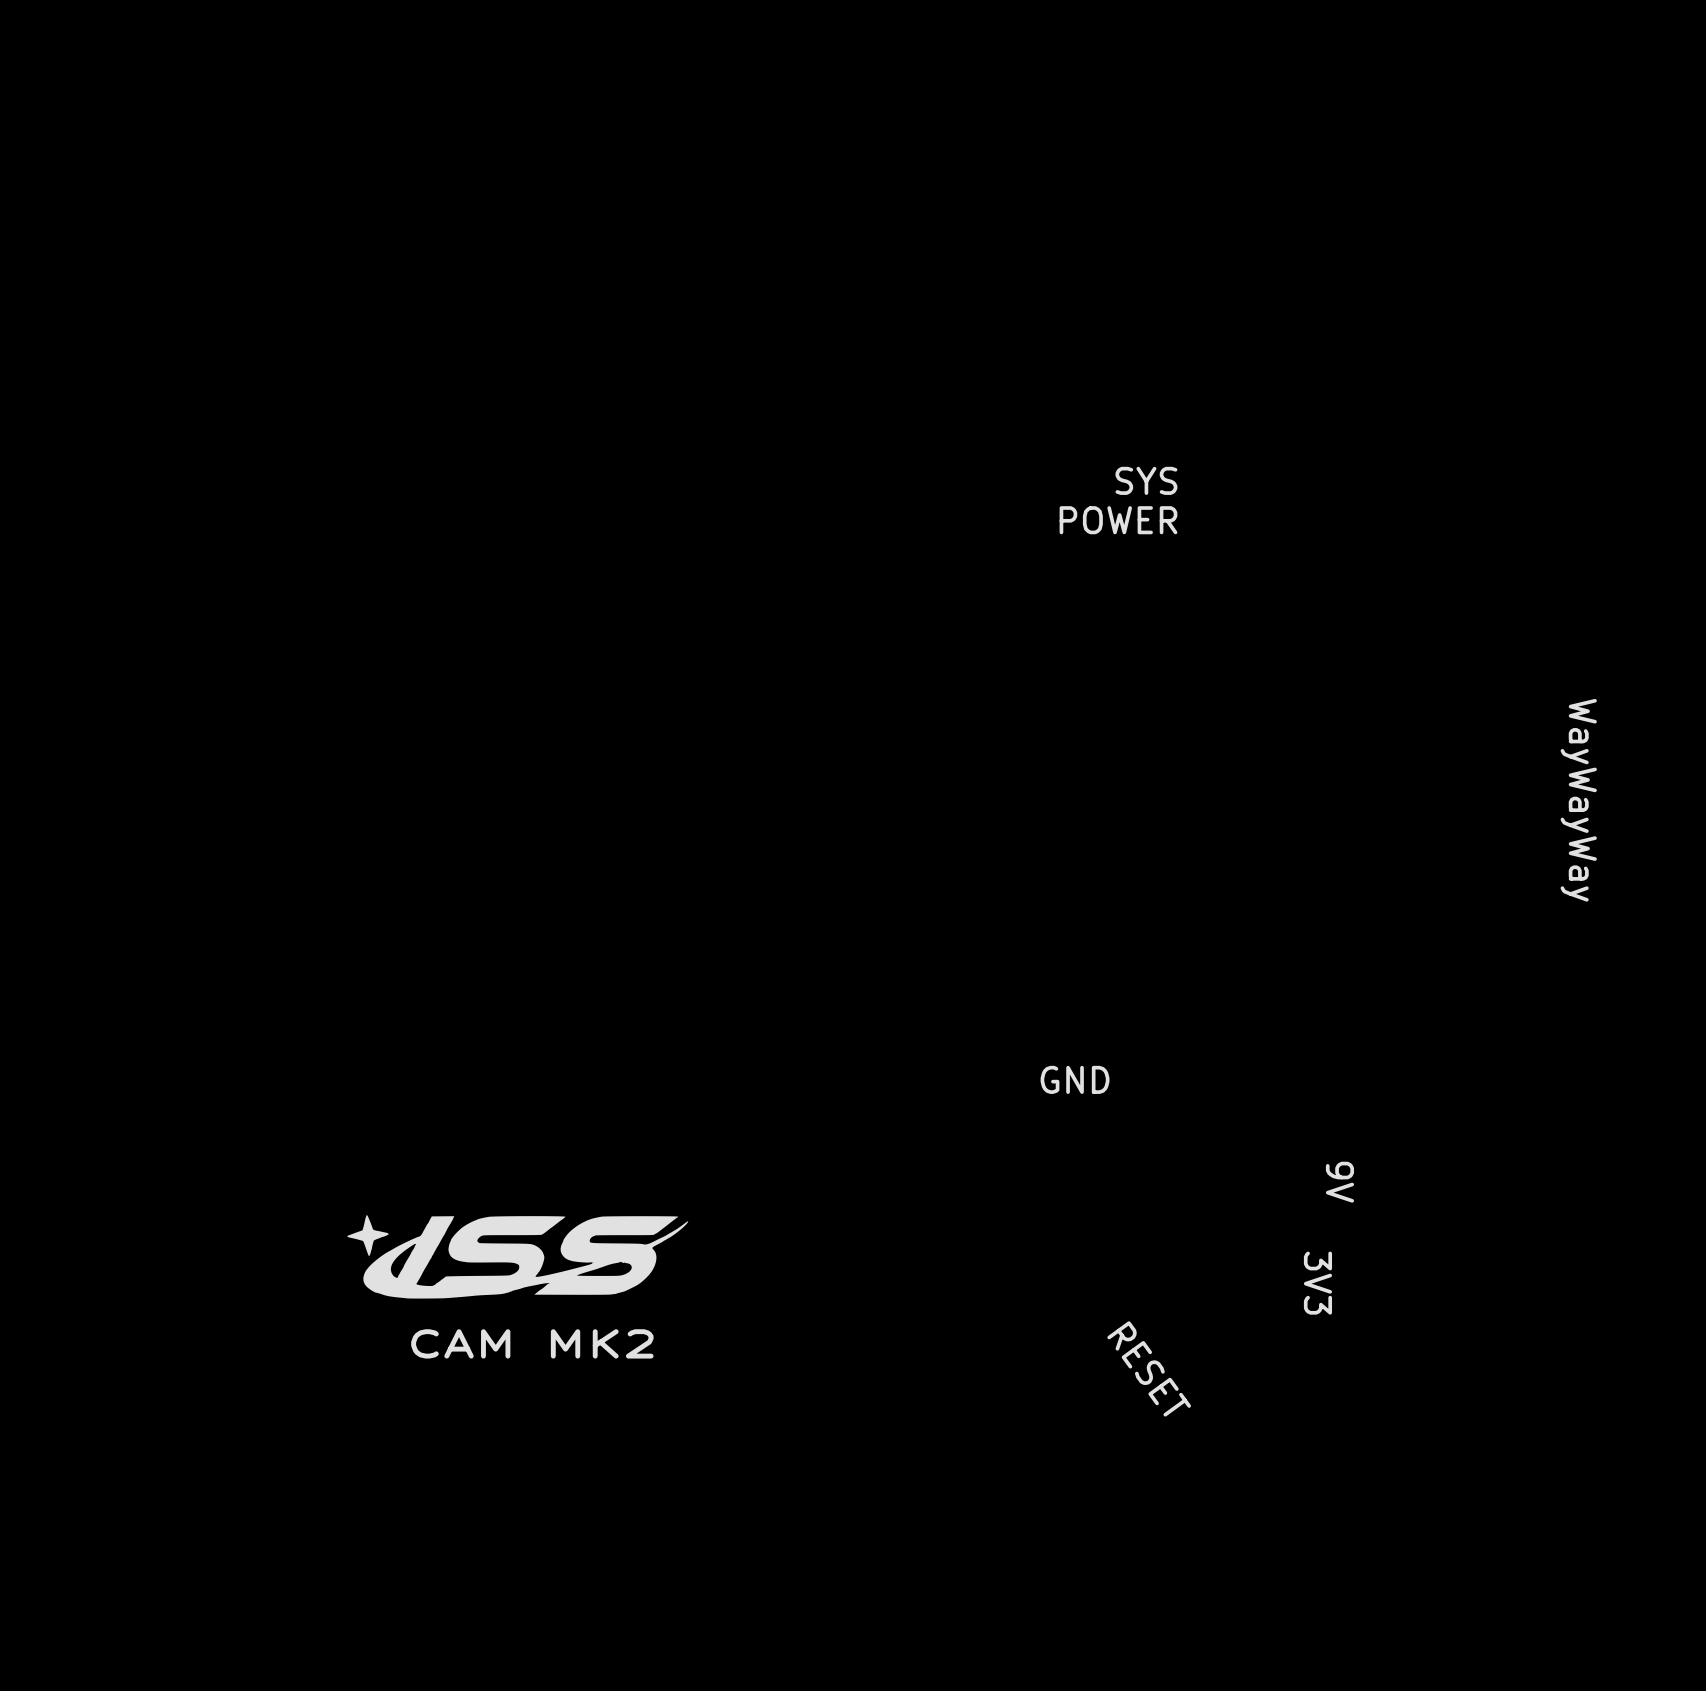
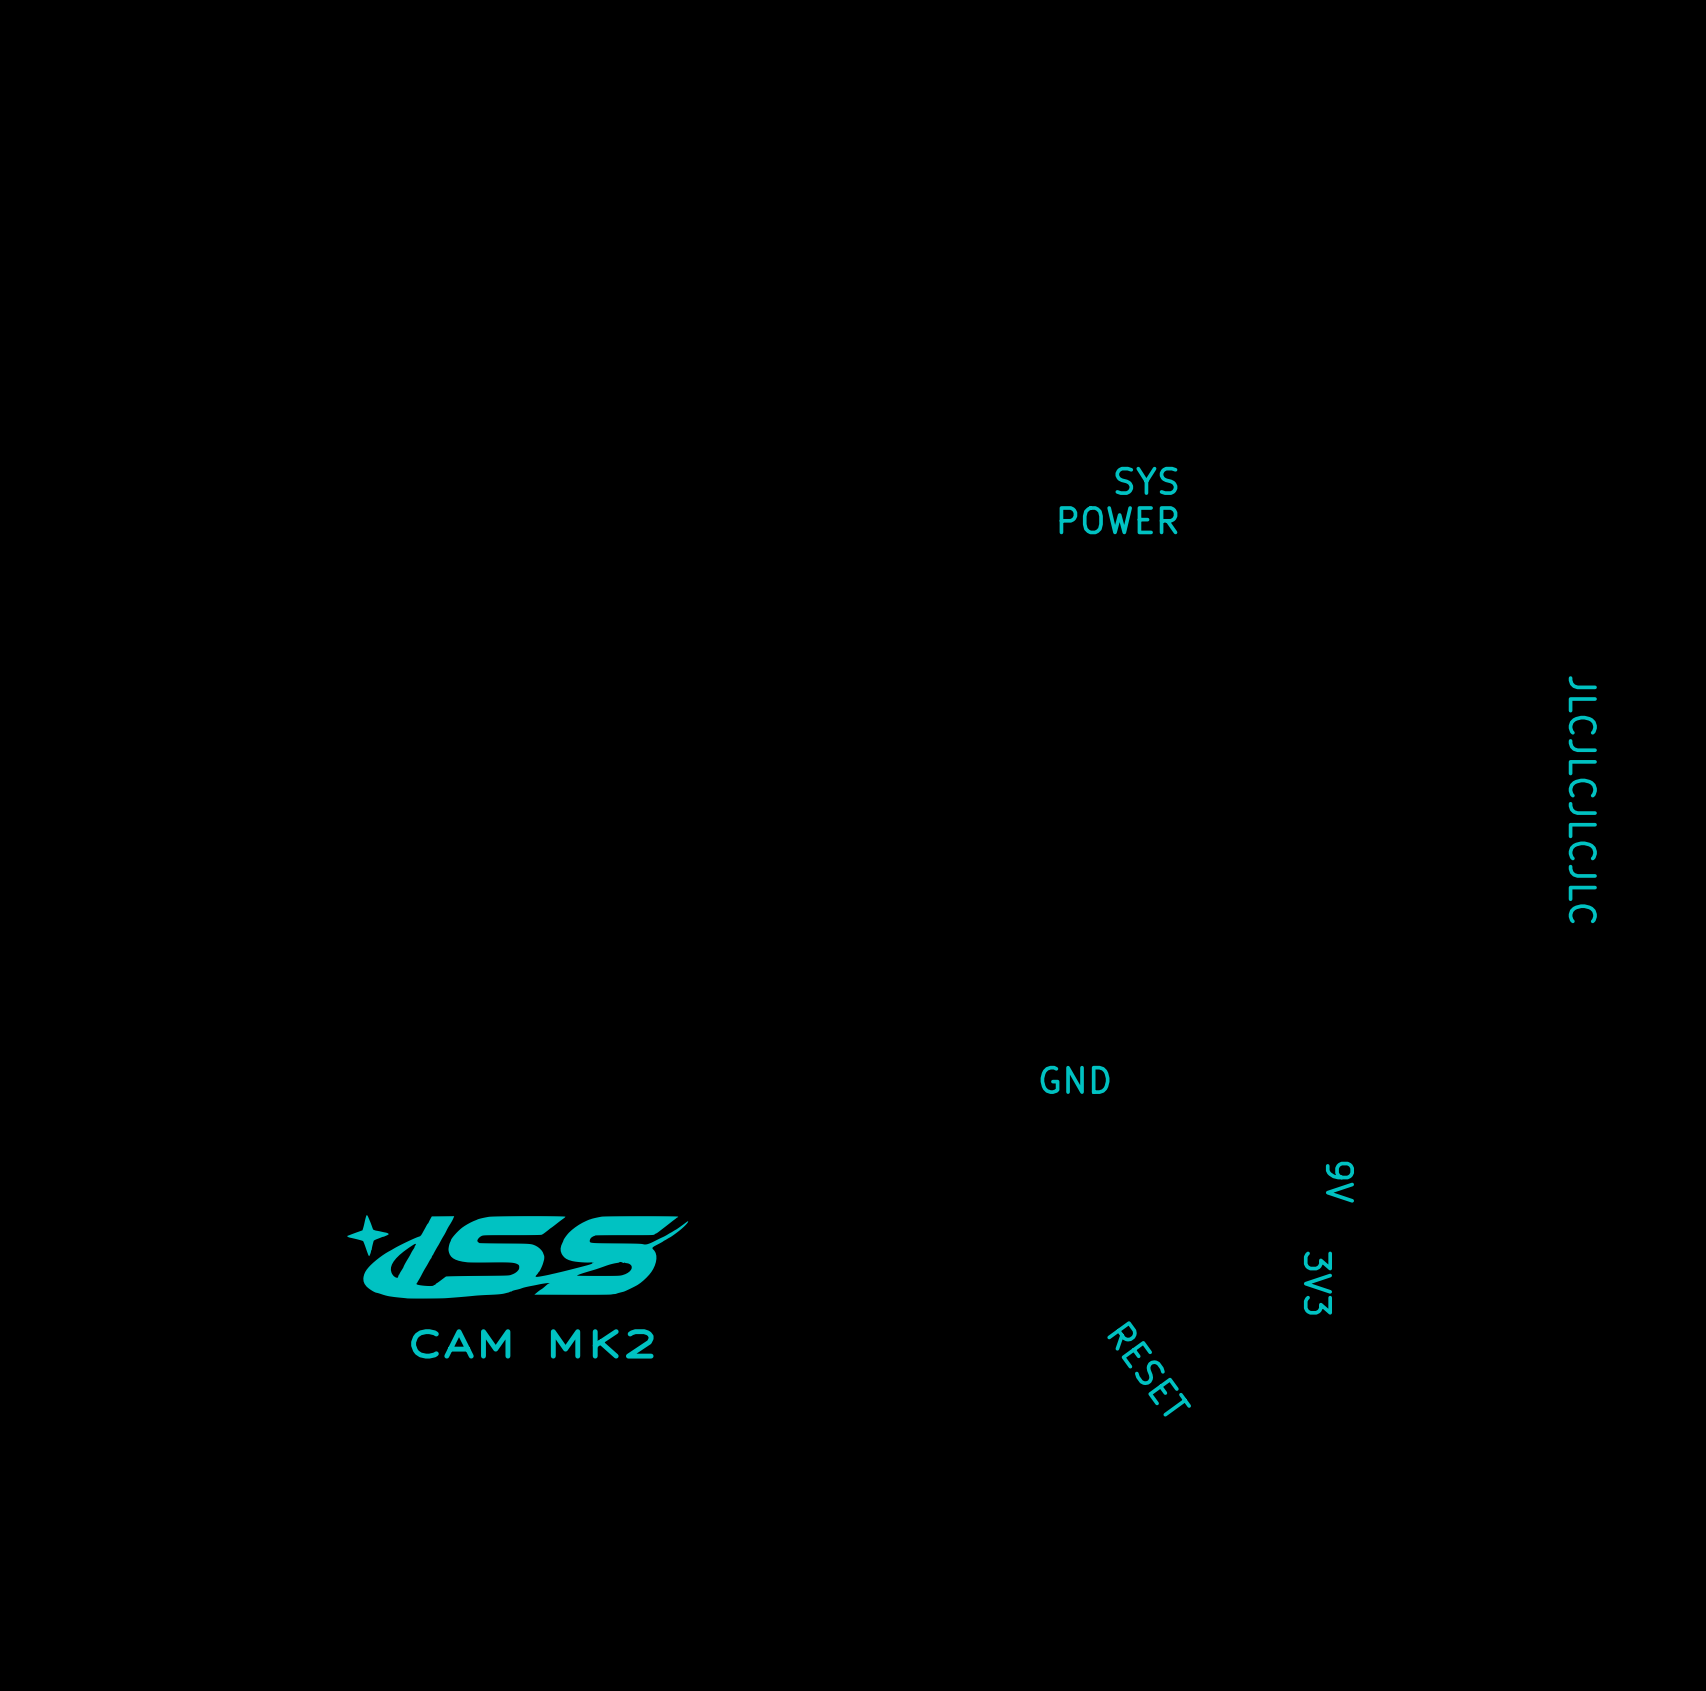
text: WayWayWay (1578, 800) -> JLCJLCJLCJLC (1582, 799)

